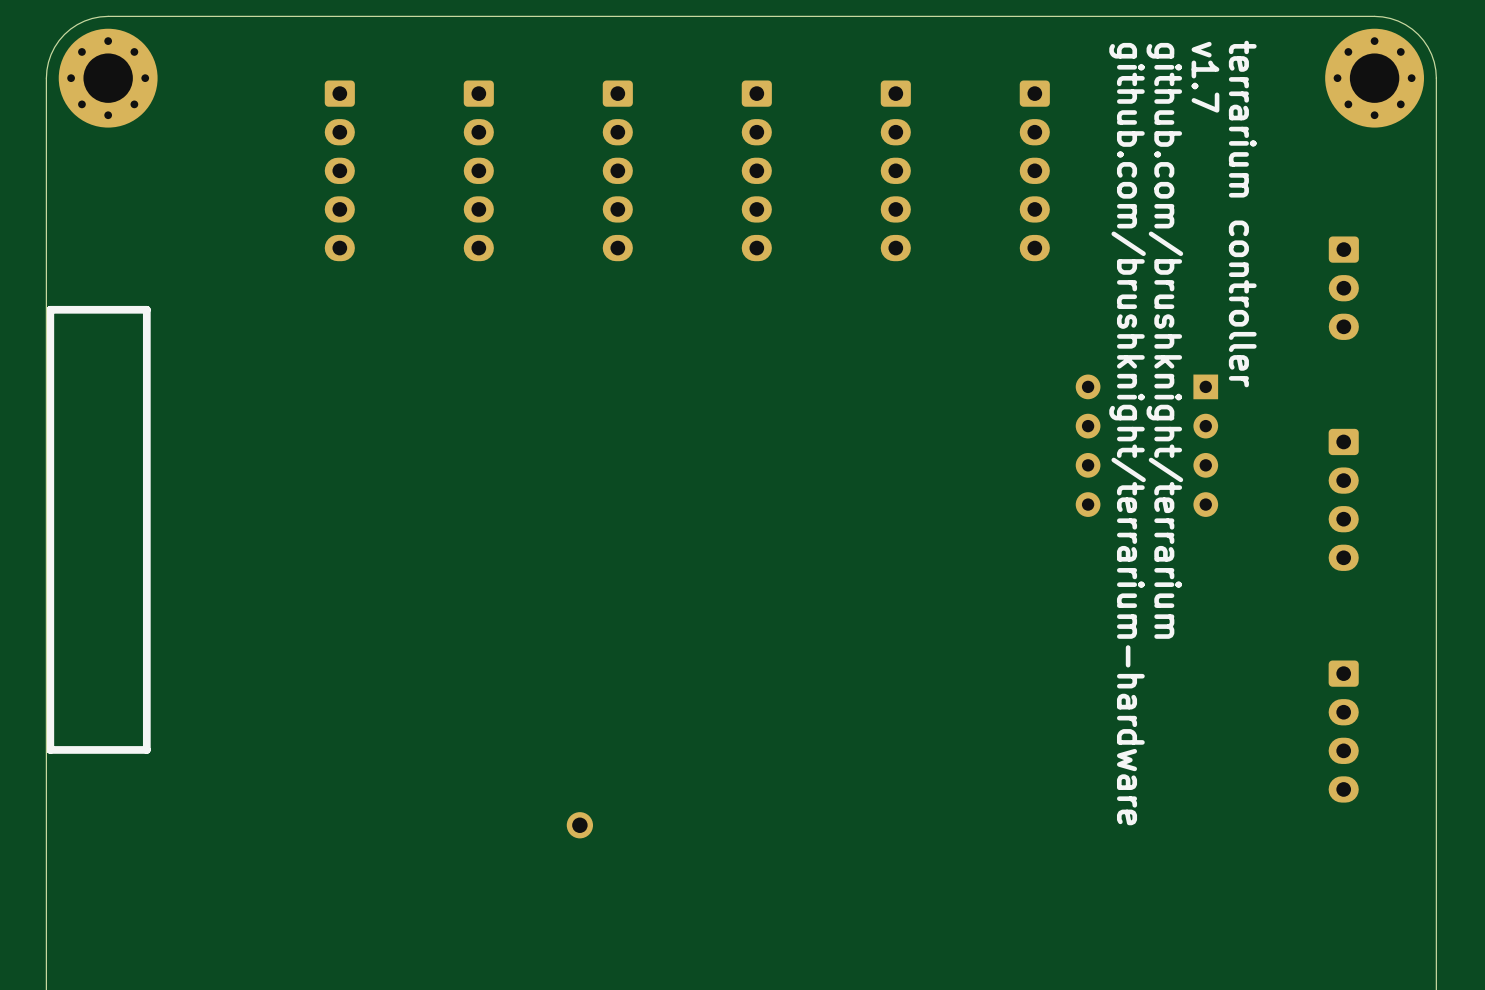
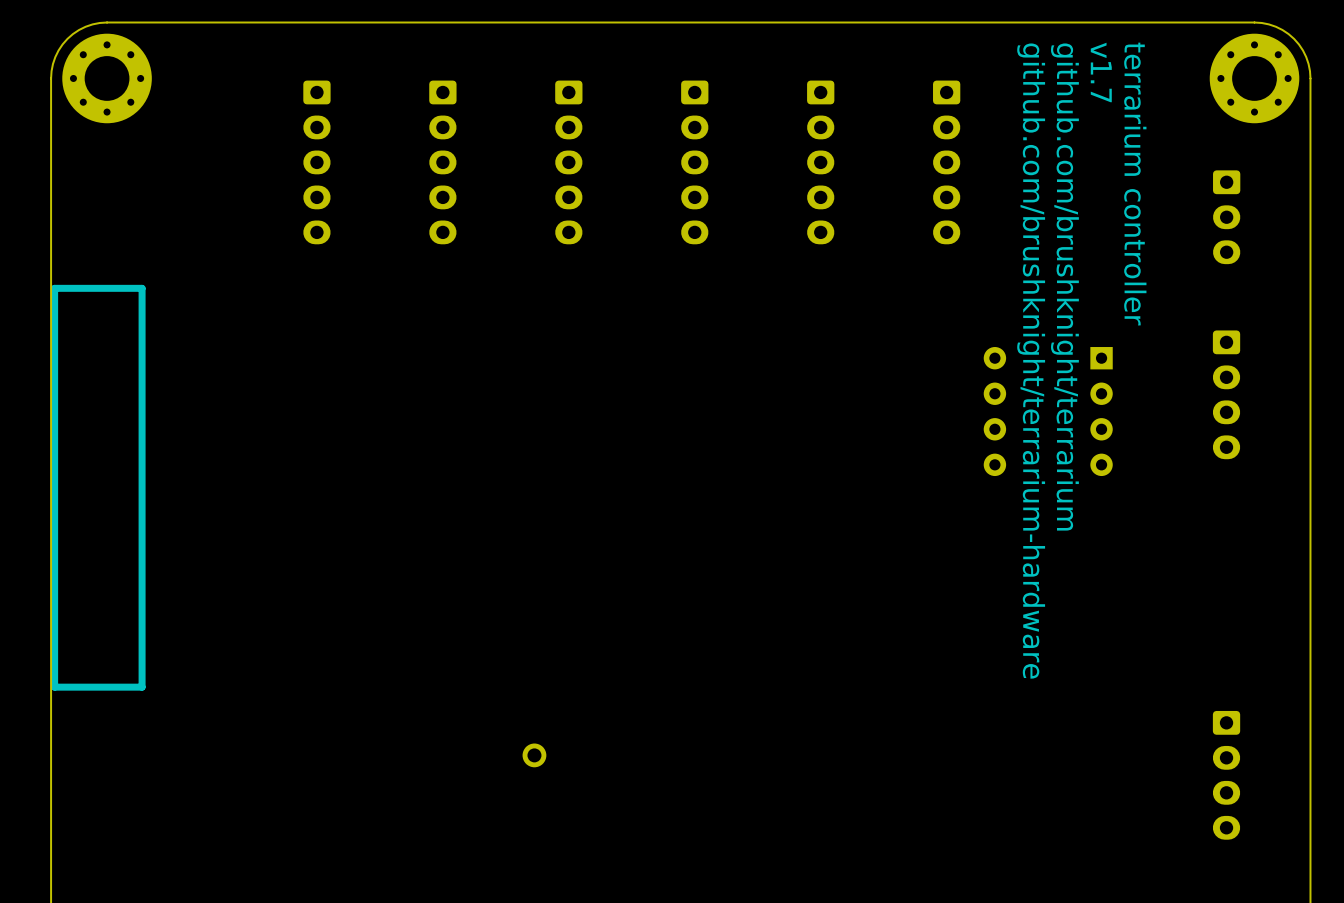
part position: (1343, 288) -> (1226, 217)
part position: (1343, 499) -> (1226, 394)
part position: (1343, 731) -> (1226, 775)

